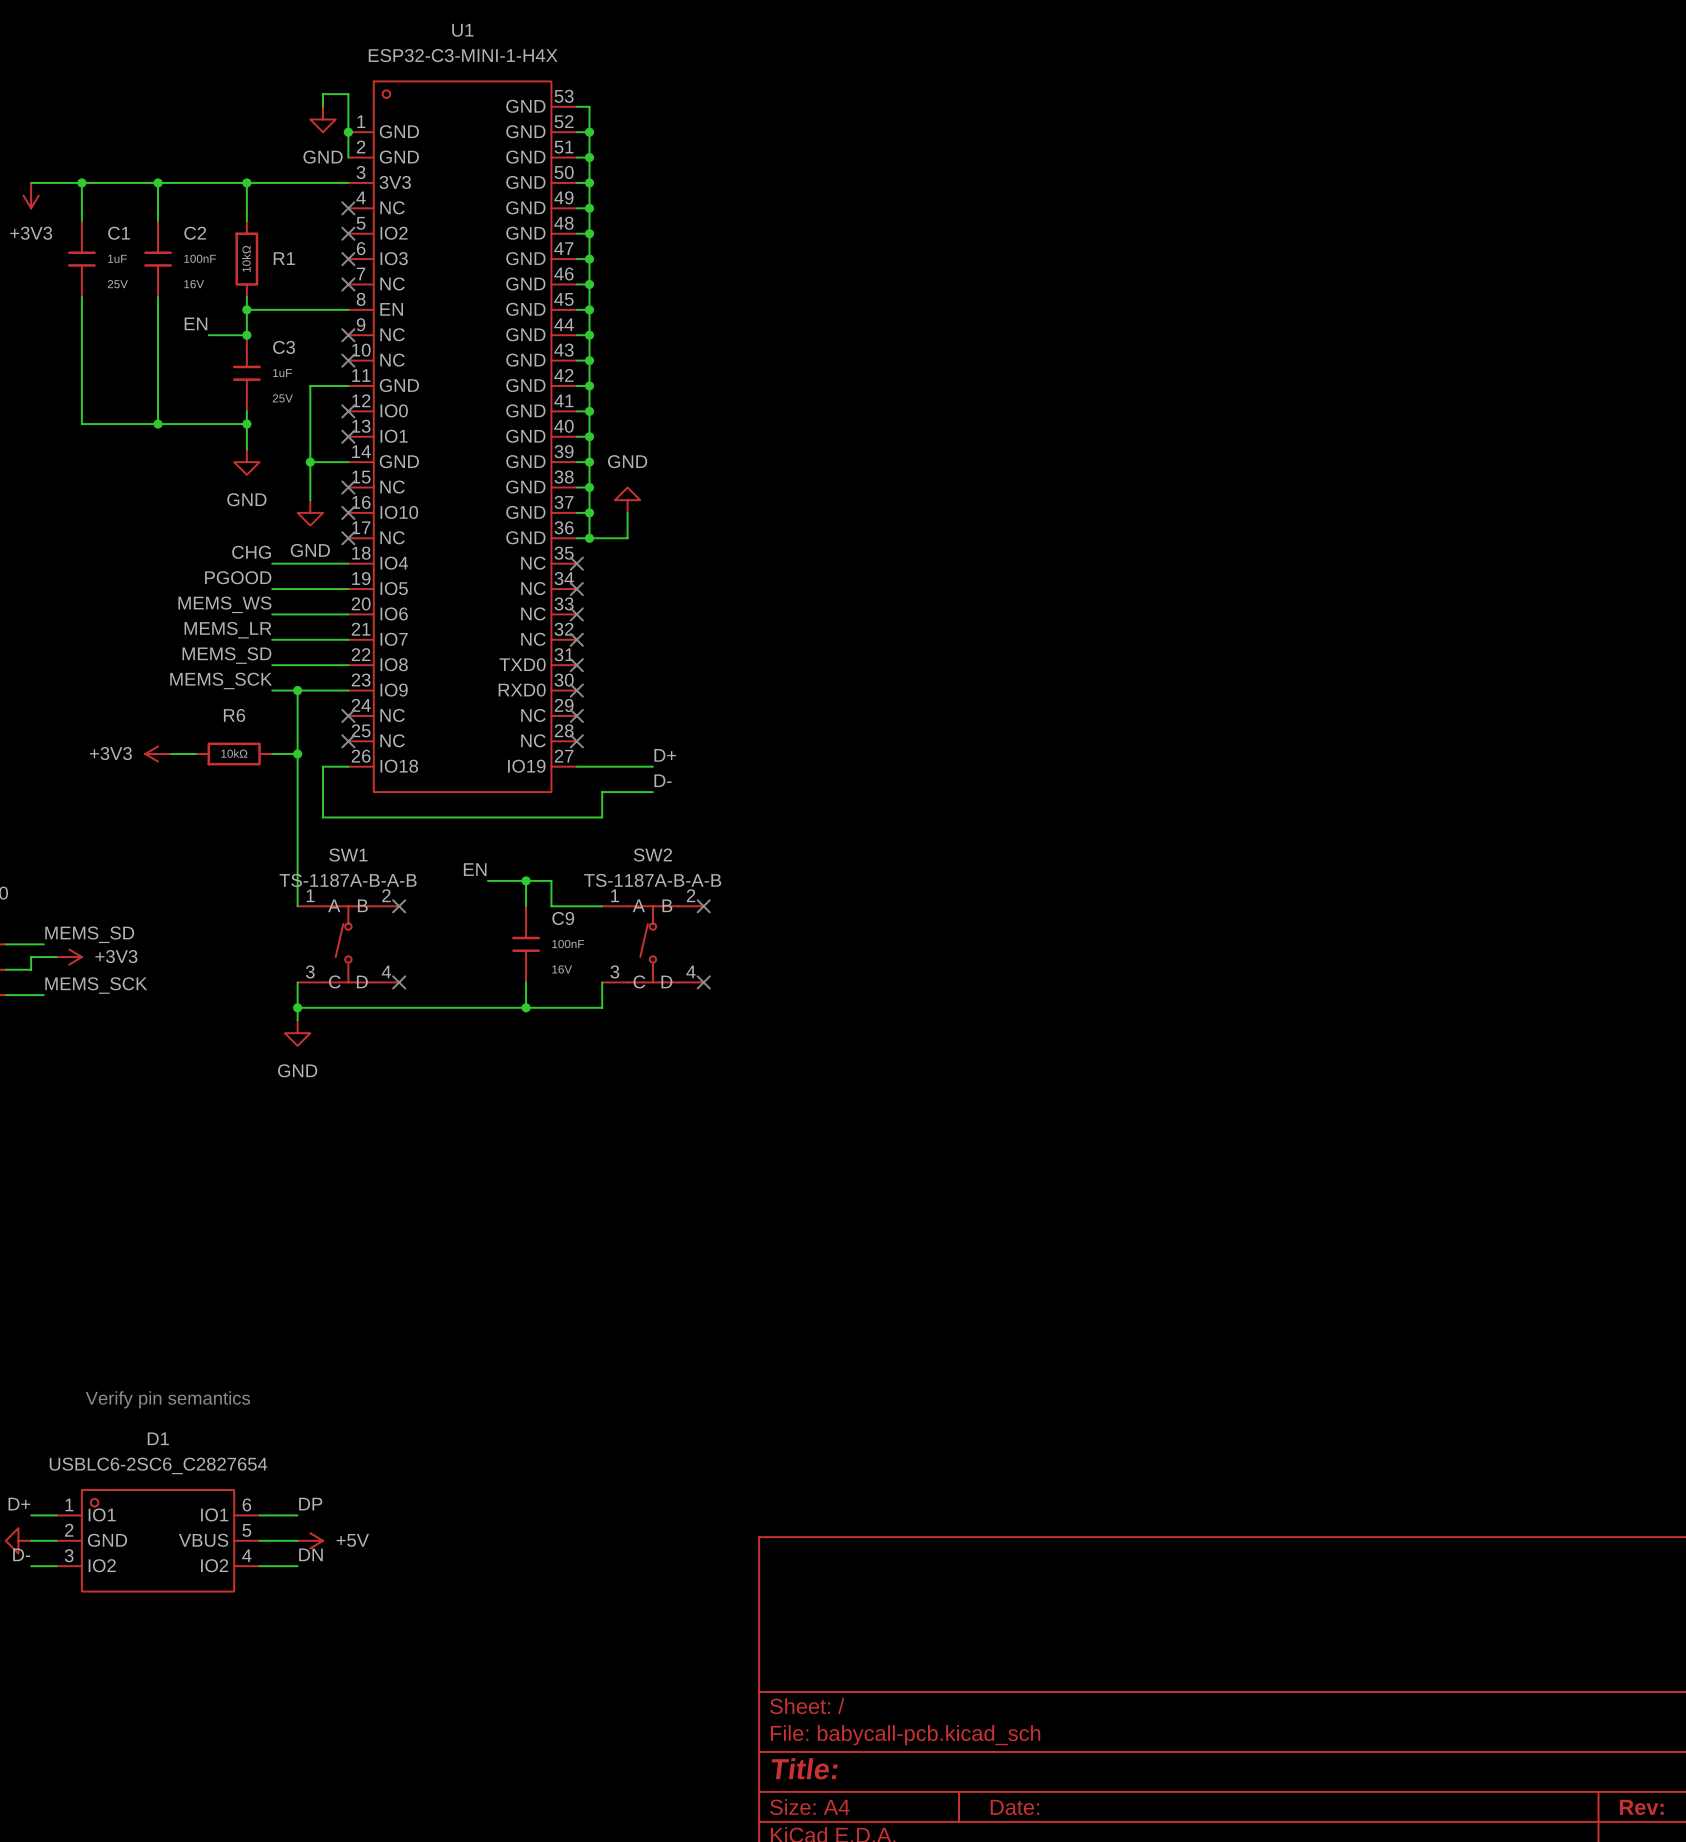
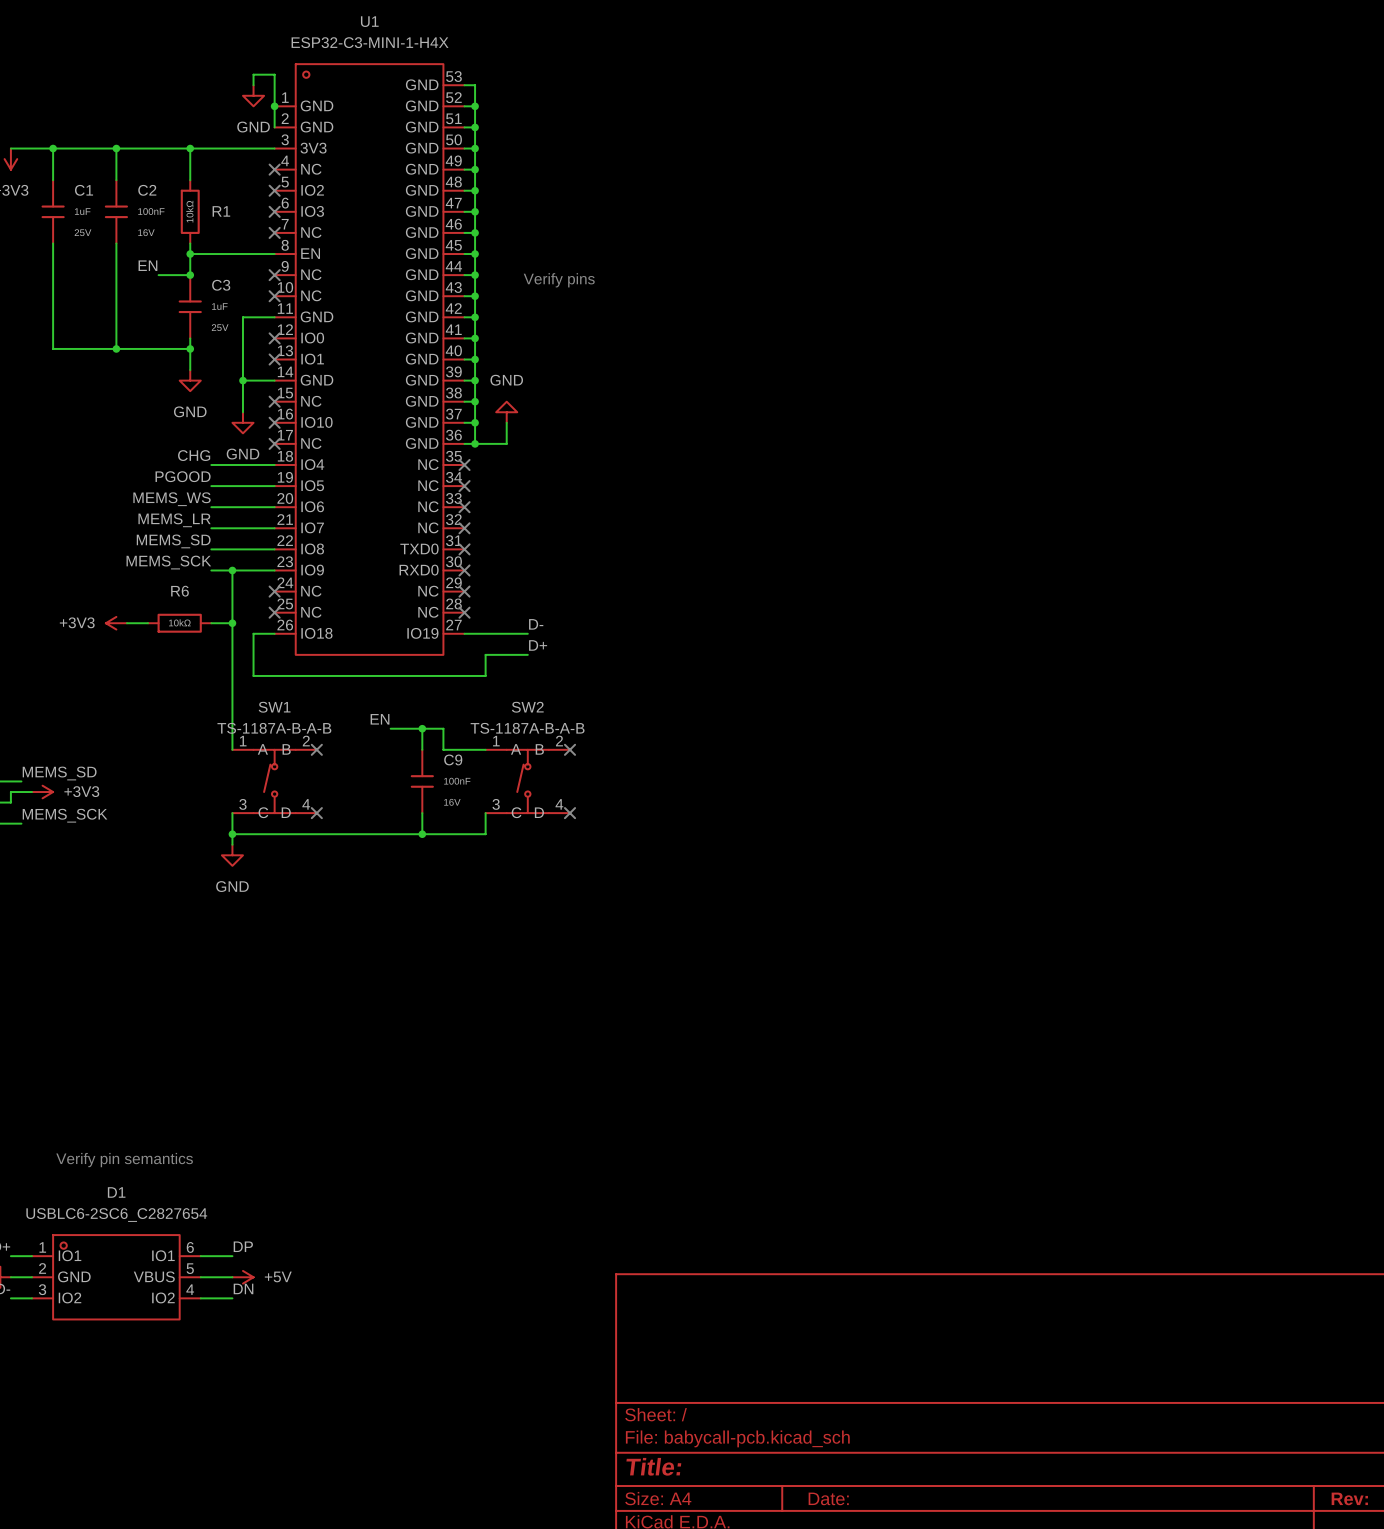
text: none -> Verify pins (559, 280)
label: D+ (665, 755) -> D- (536, 624)
label: D- (663, 780) -> D+ (538, 645)

